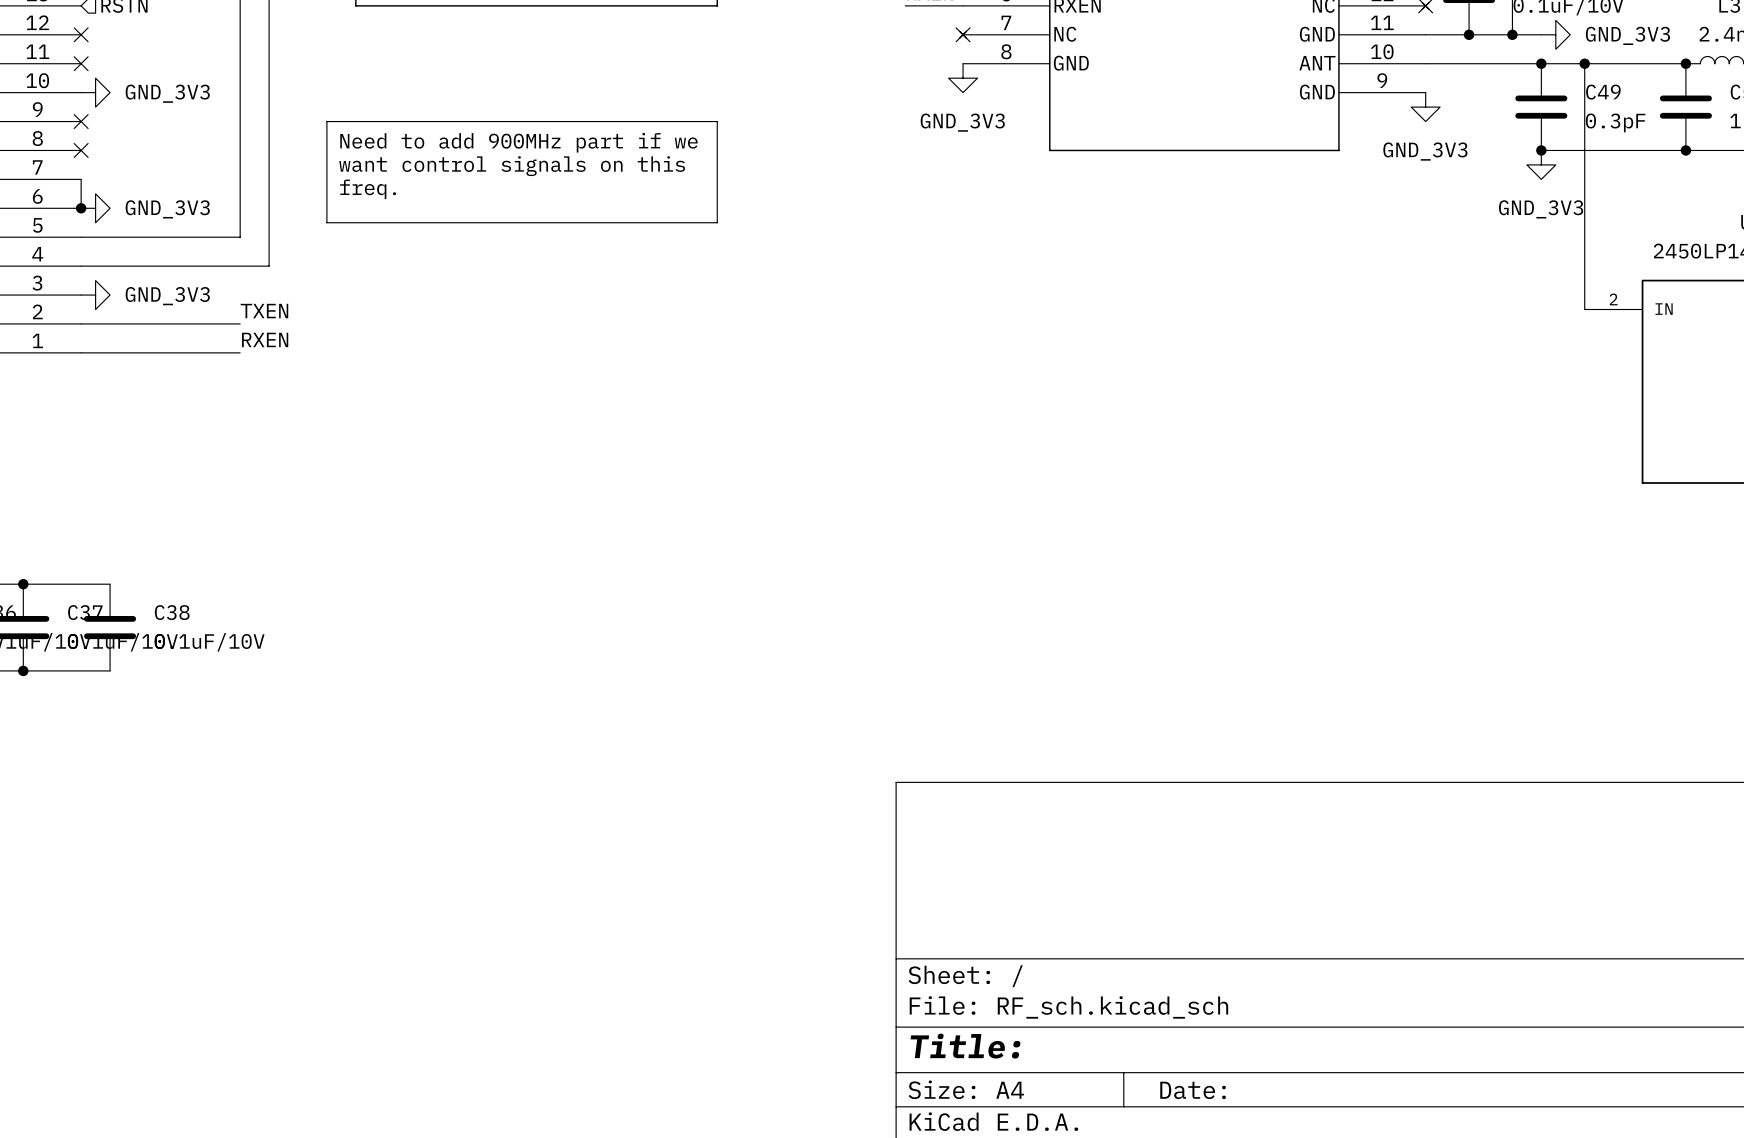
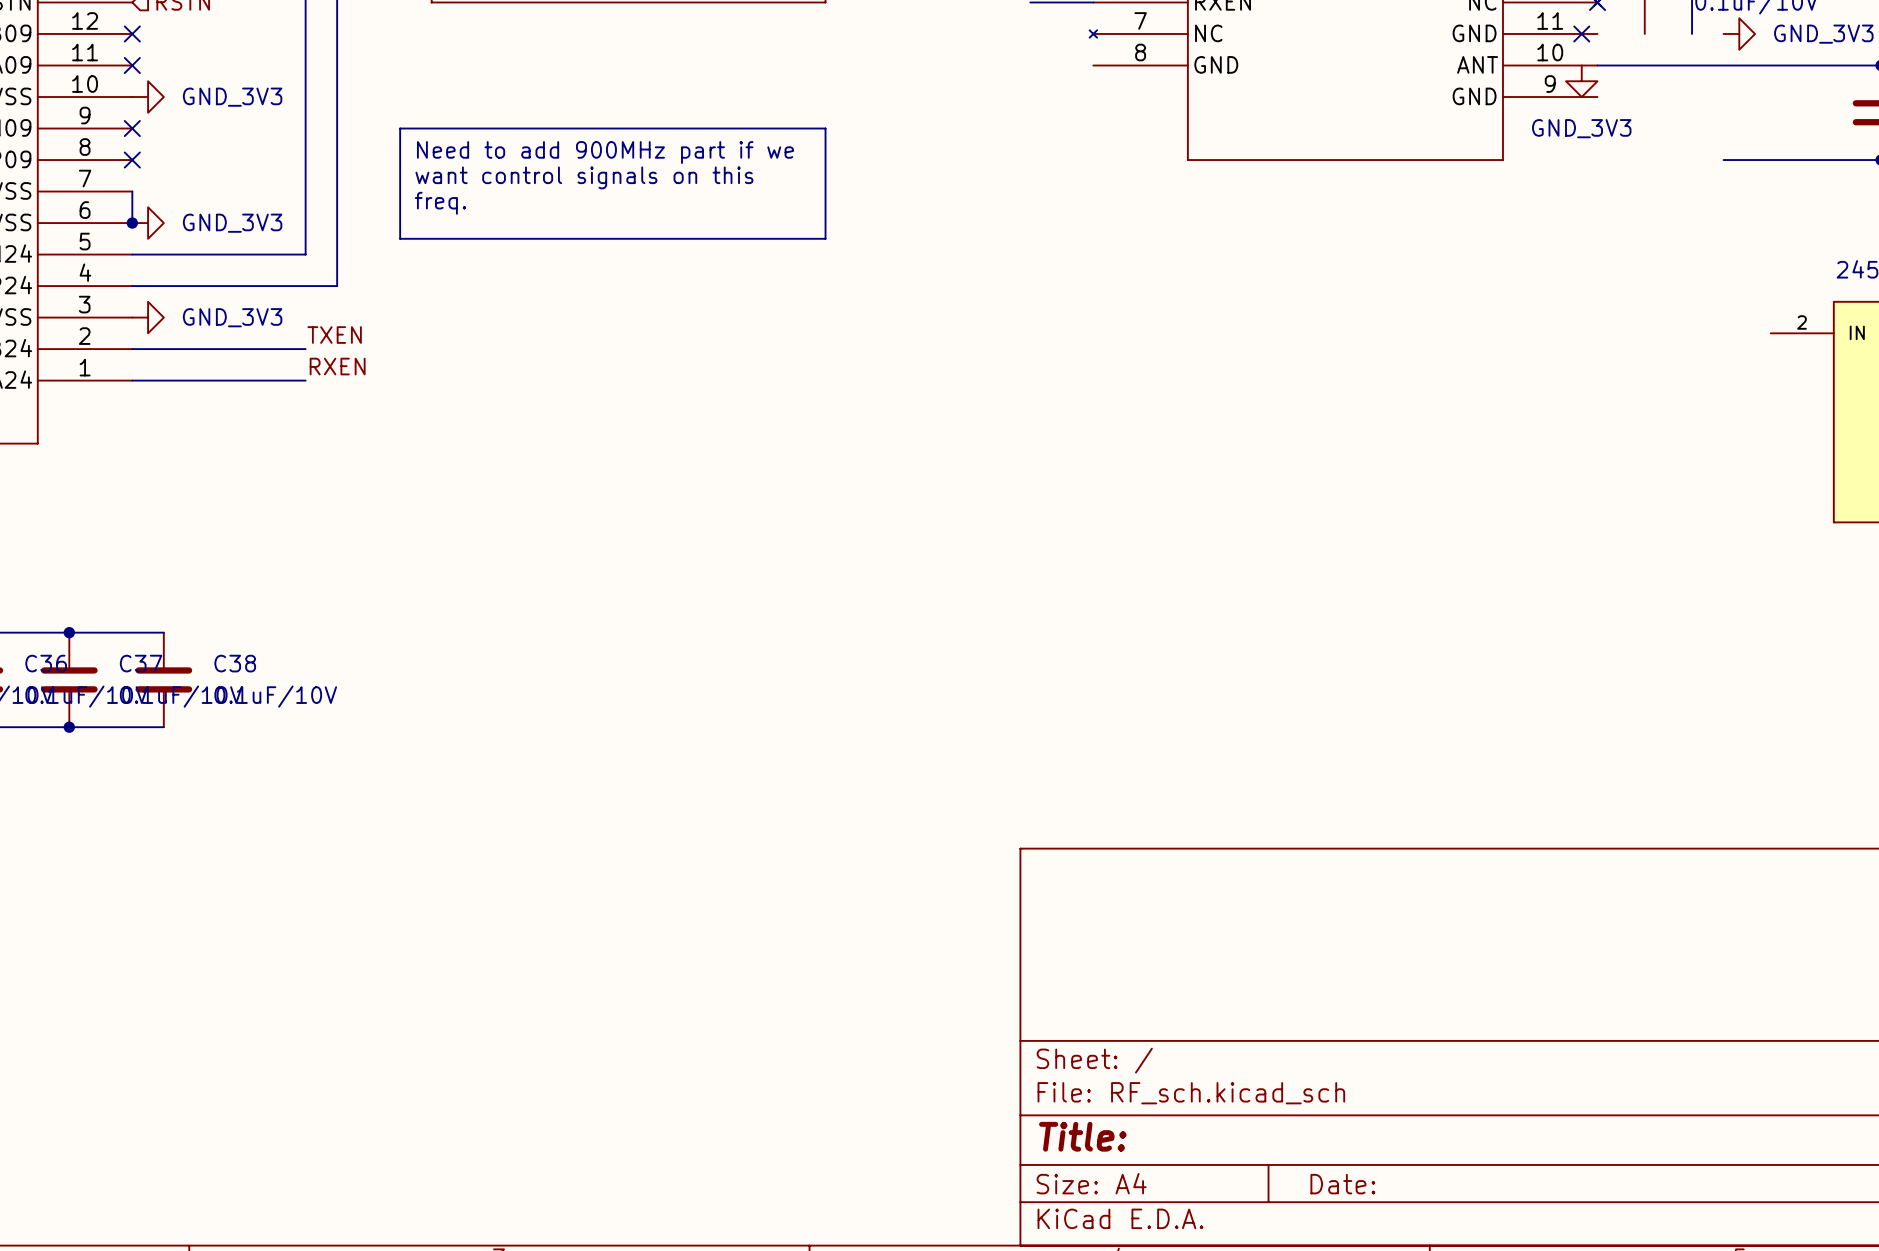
no-connect mark: (963, 34) -> none
no-connect mark: none -> (1581, 33)
wire: (1425, 34) (1541, 34) -> none
junction: (1469, 34) -> none
junction: (1512, 34) -> none
junction: (1541, 63) -> none
wire: (1584, 63) (1584, 309) -> none
junction: (1584, 63) -> none
power symbol: GND_3V3 (963, 78) -> none
power symbol position: GND_3V3 (1425, 107) -> GND_3V3 (1581, 81)
C49: 0.3pF (1541, 107) -> none
junction: (1541, 150) -> none
power symbol: GND_3V3 (1541, 164) -> none

